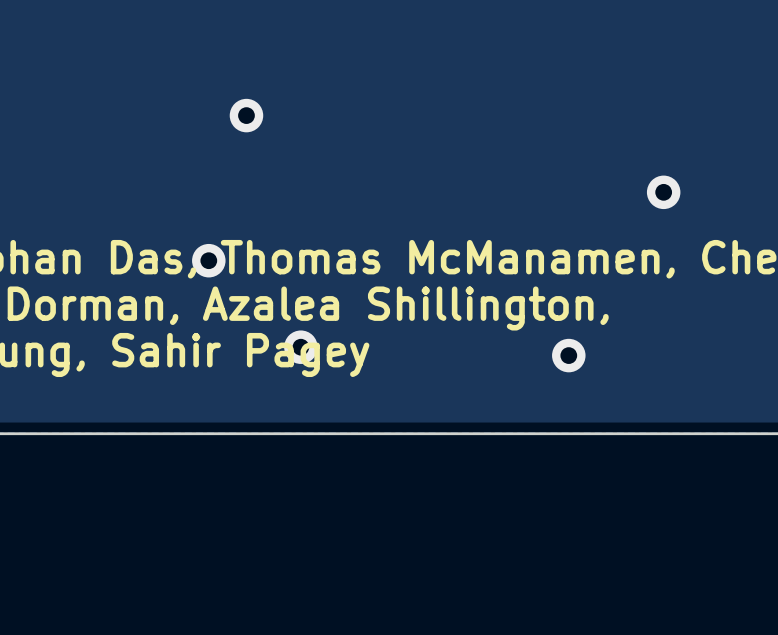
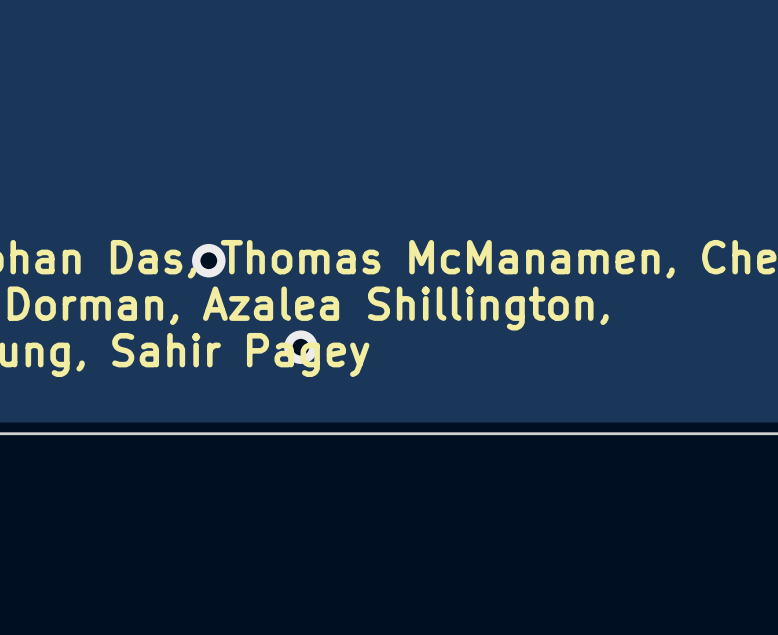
via: (246, 115) -> none
via: (663, 192) -> none
via: (568, 355) -> none

